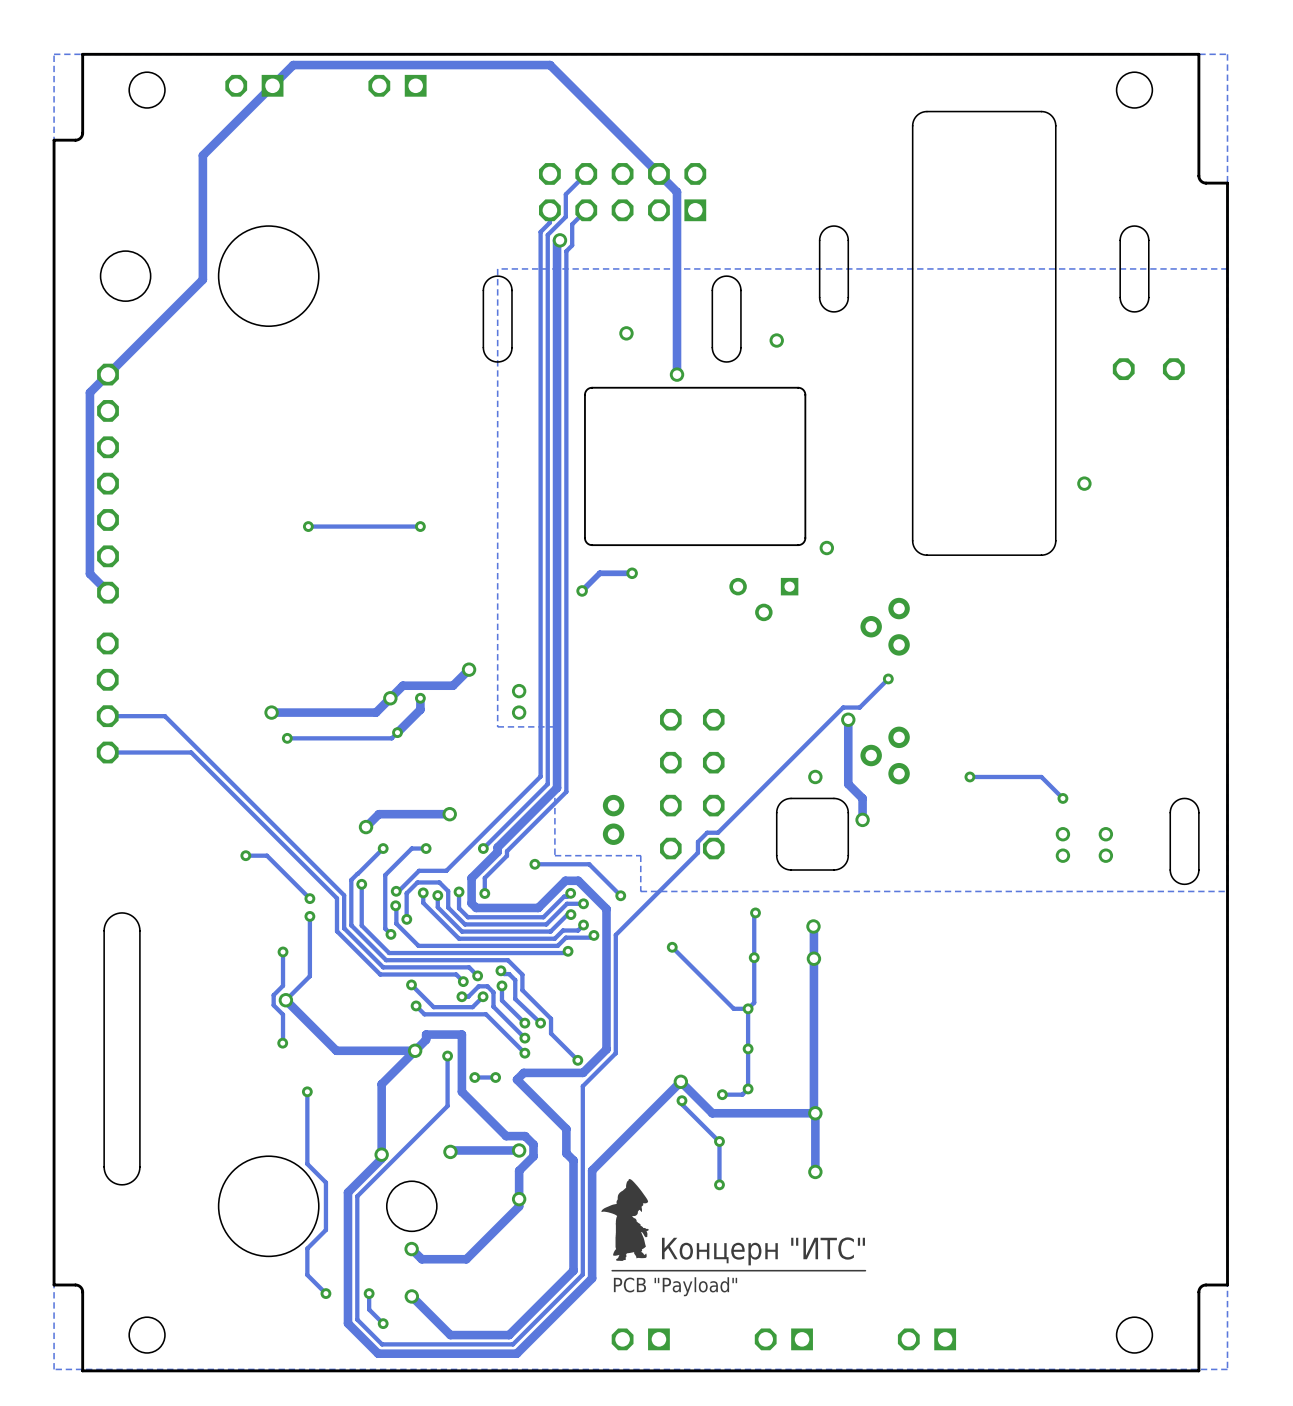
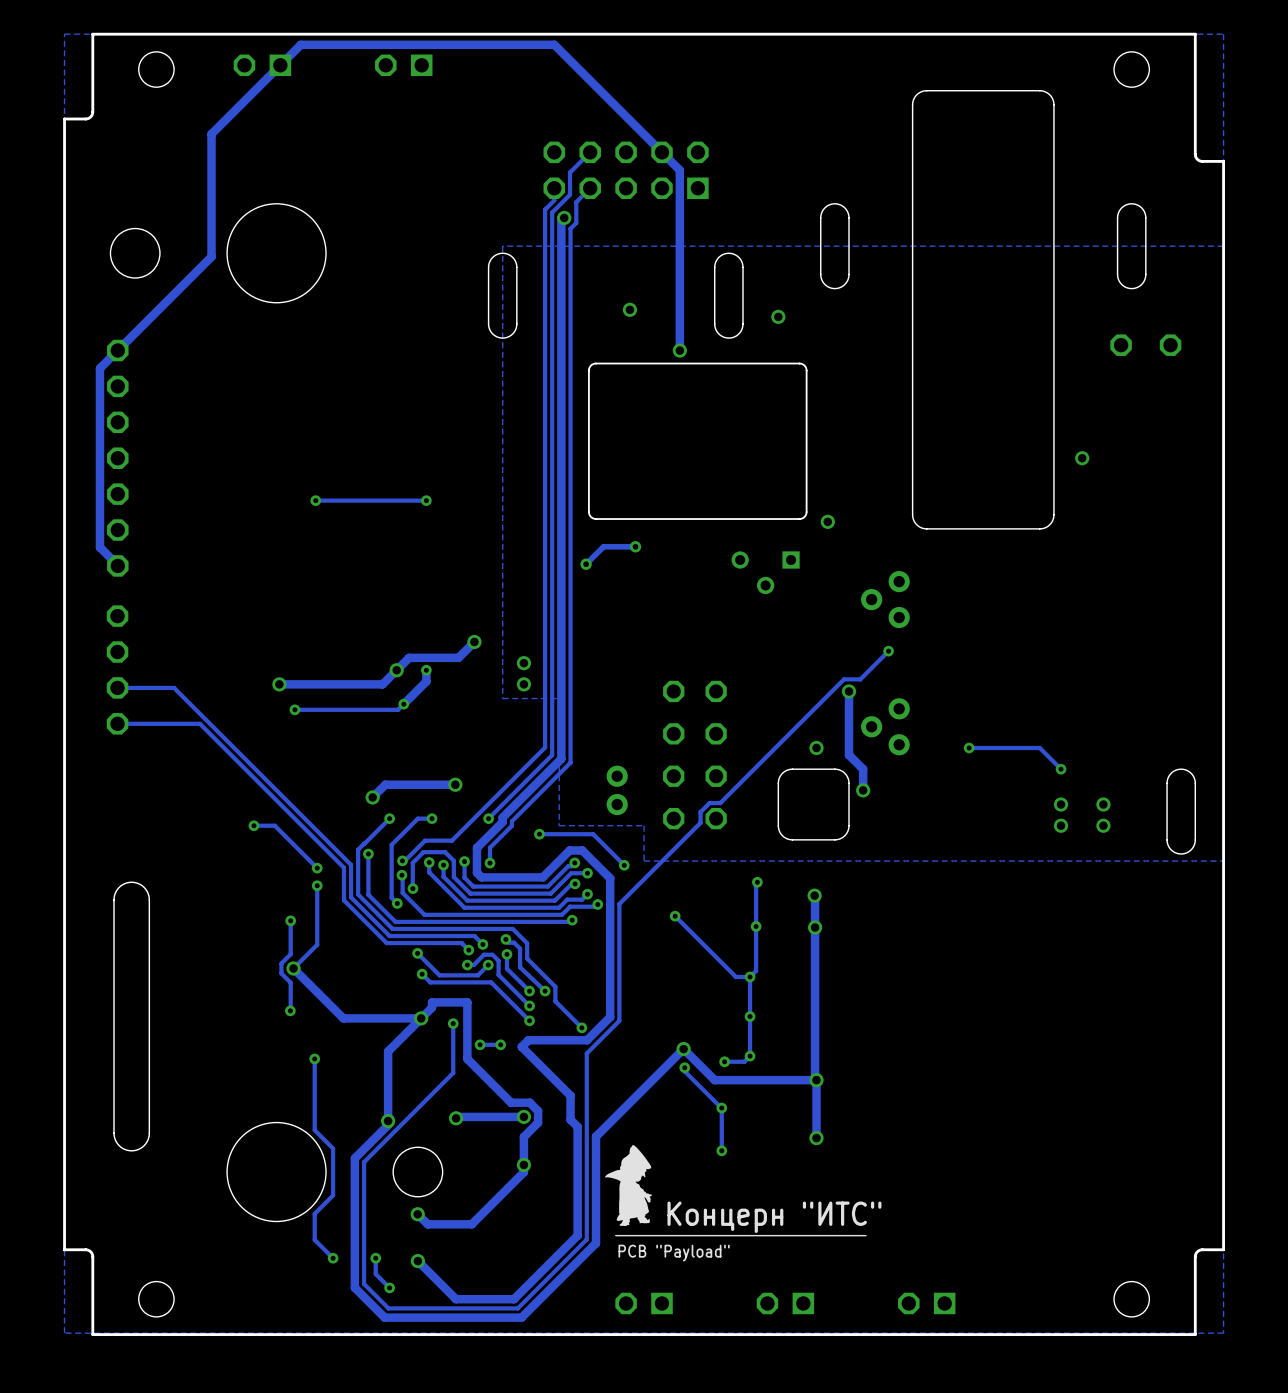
drawing shape: [601, 1179, 867, 1297] -> [605, 1145, 882, 1262]

